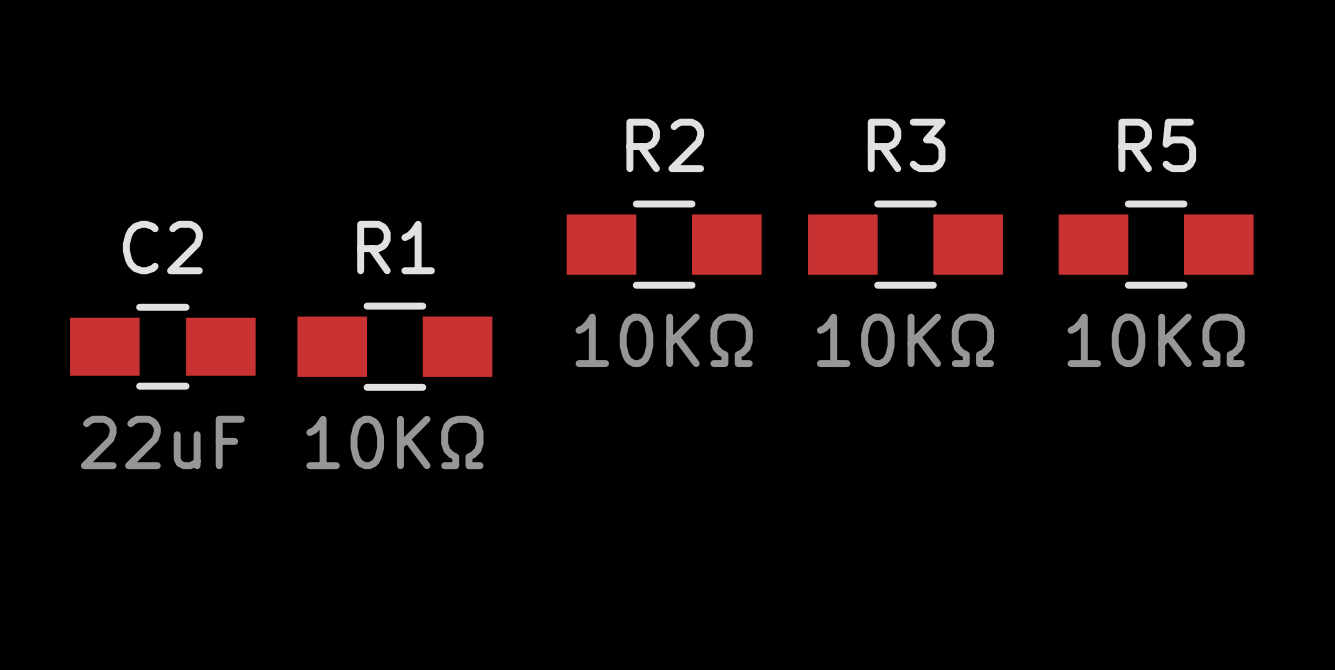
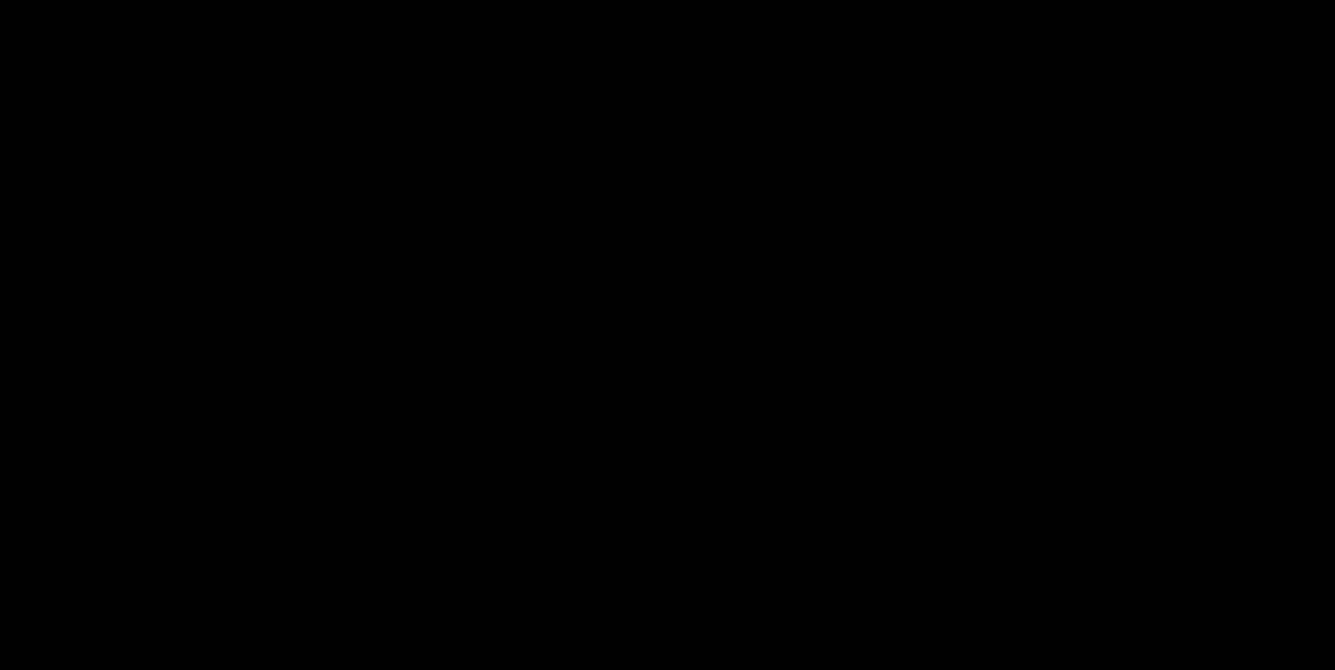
R2: 10KΩ (664, 244) -> none
R3: 10KΩ (905, 244) -> none
R5: 10KΩ (1156, 244) -> none
C2: 22uF (162, 346) -> none
R1: 10KΩ (394, 346) -> none

